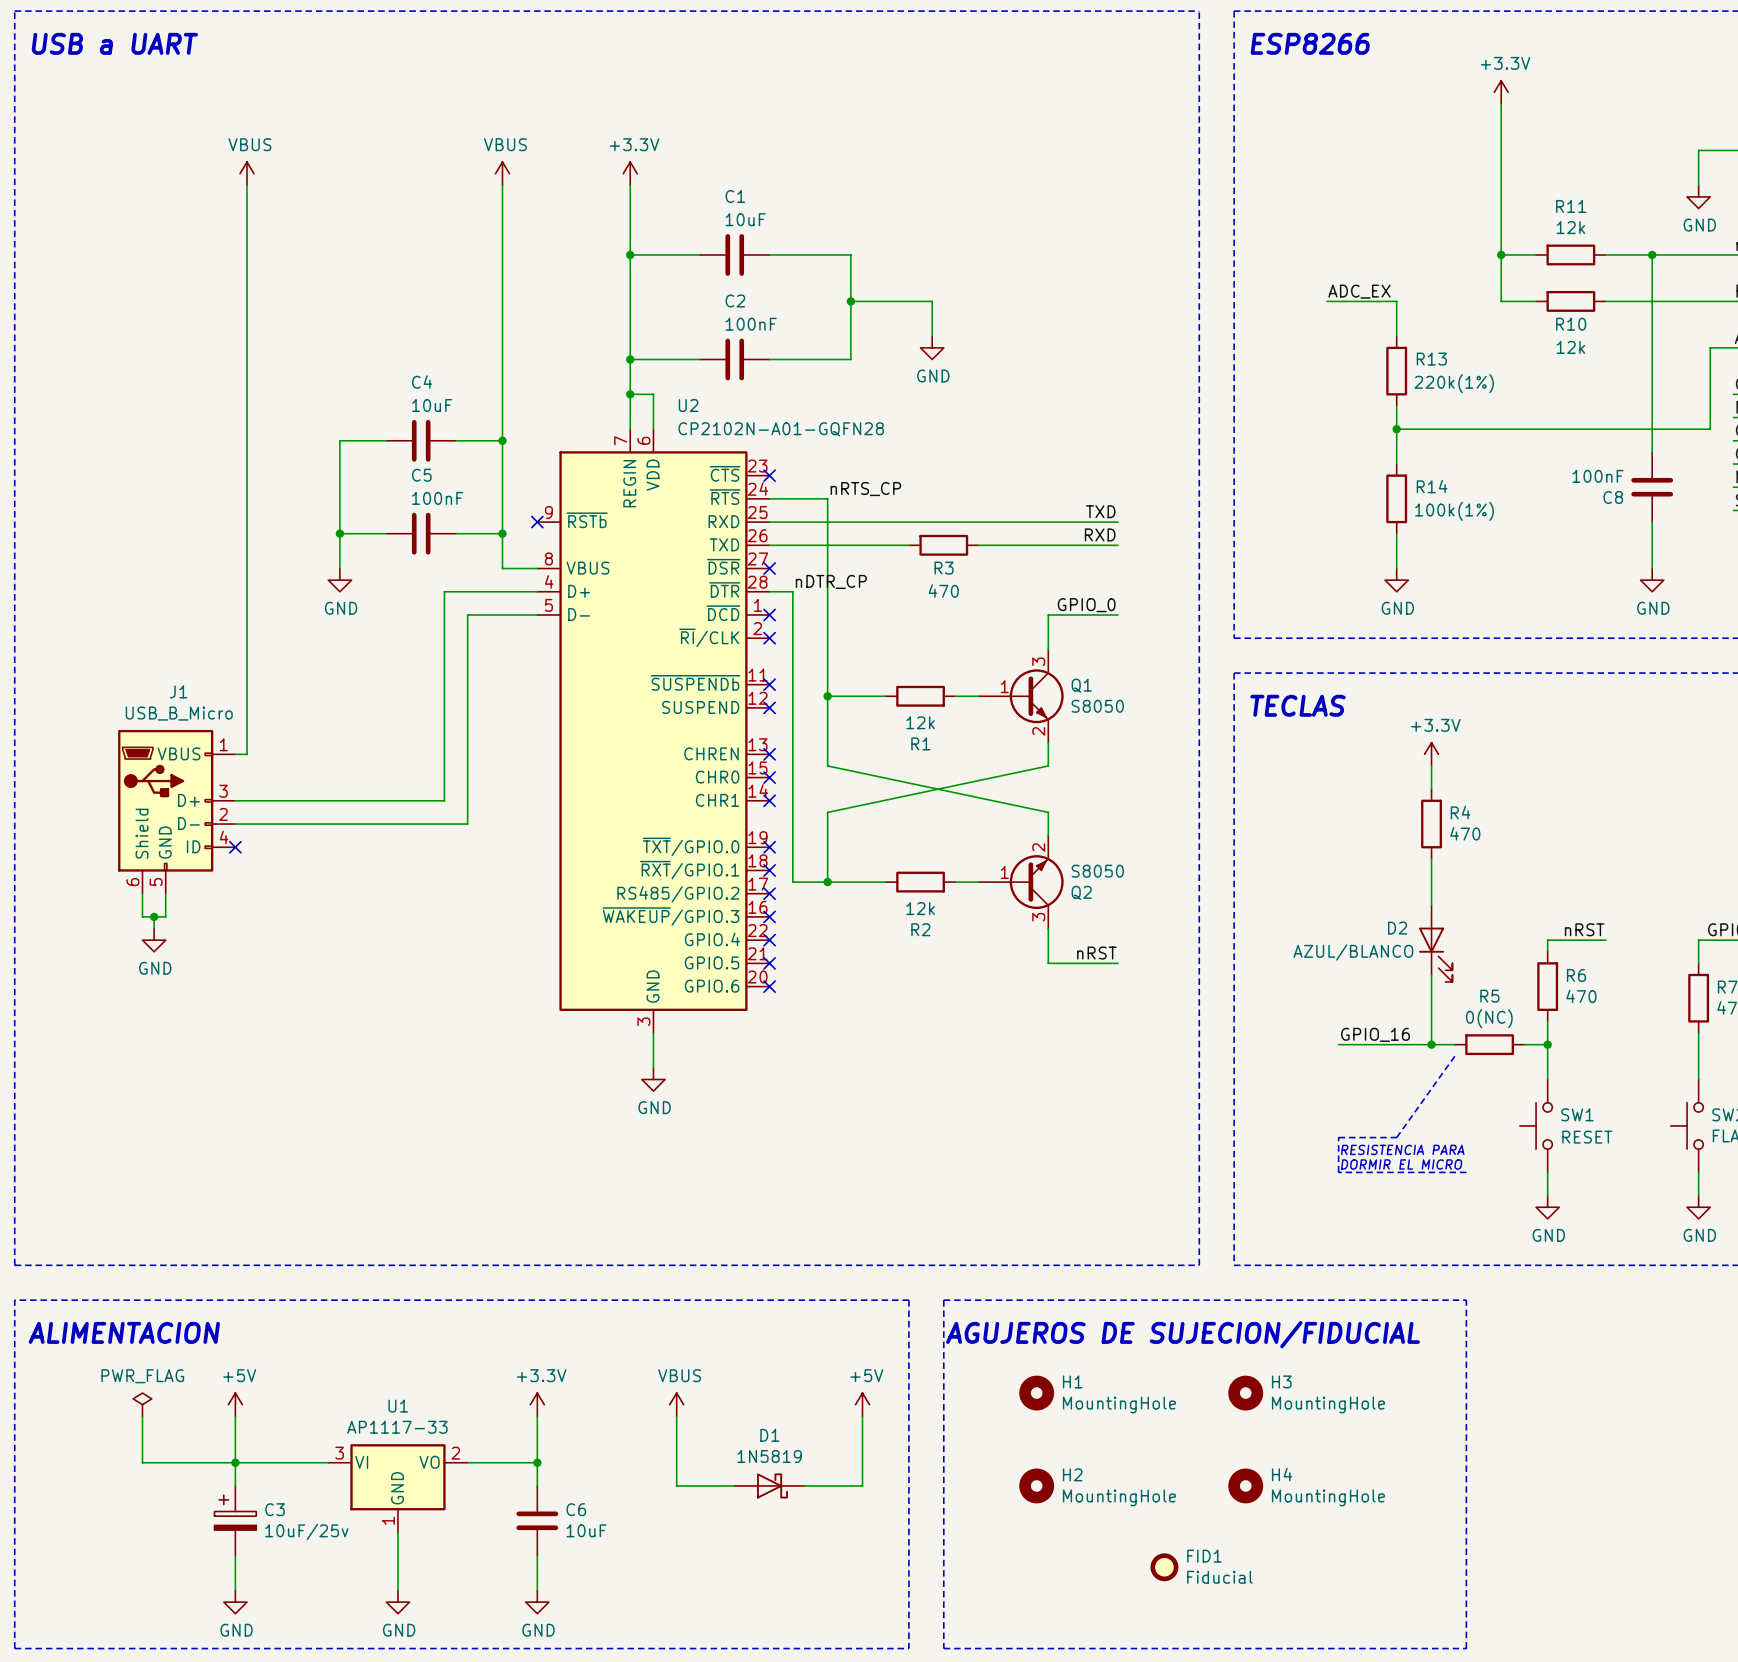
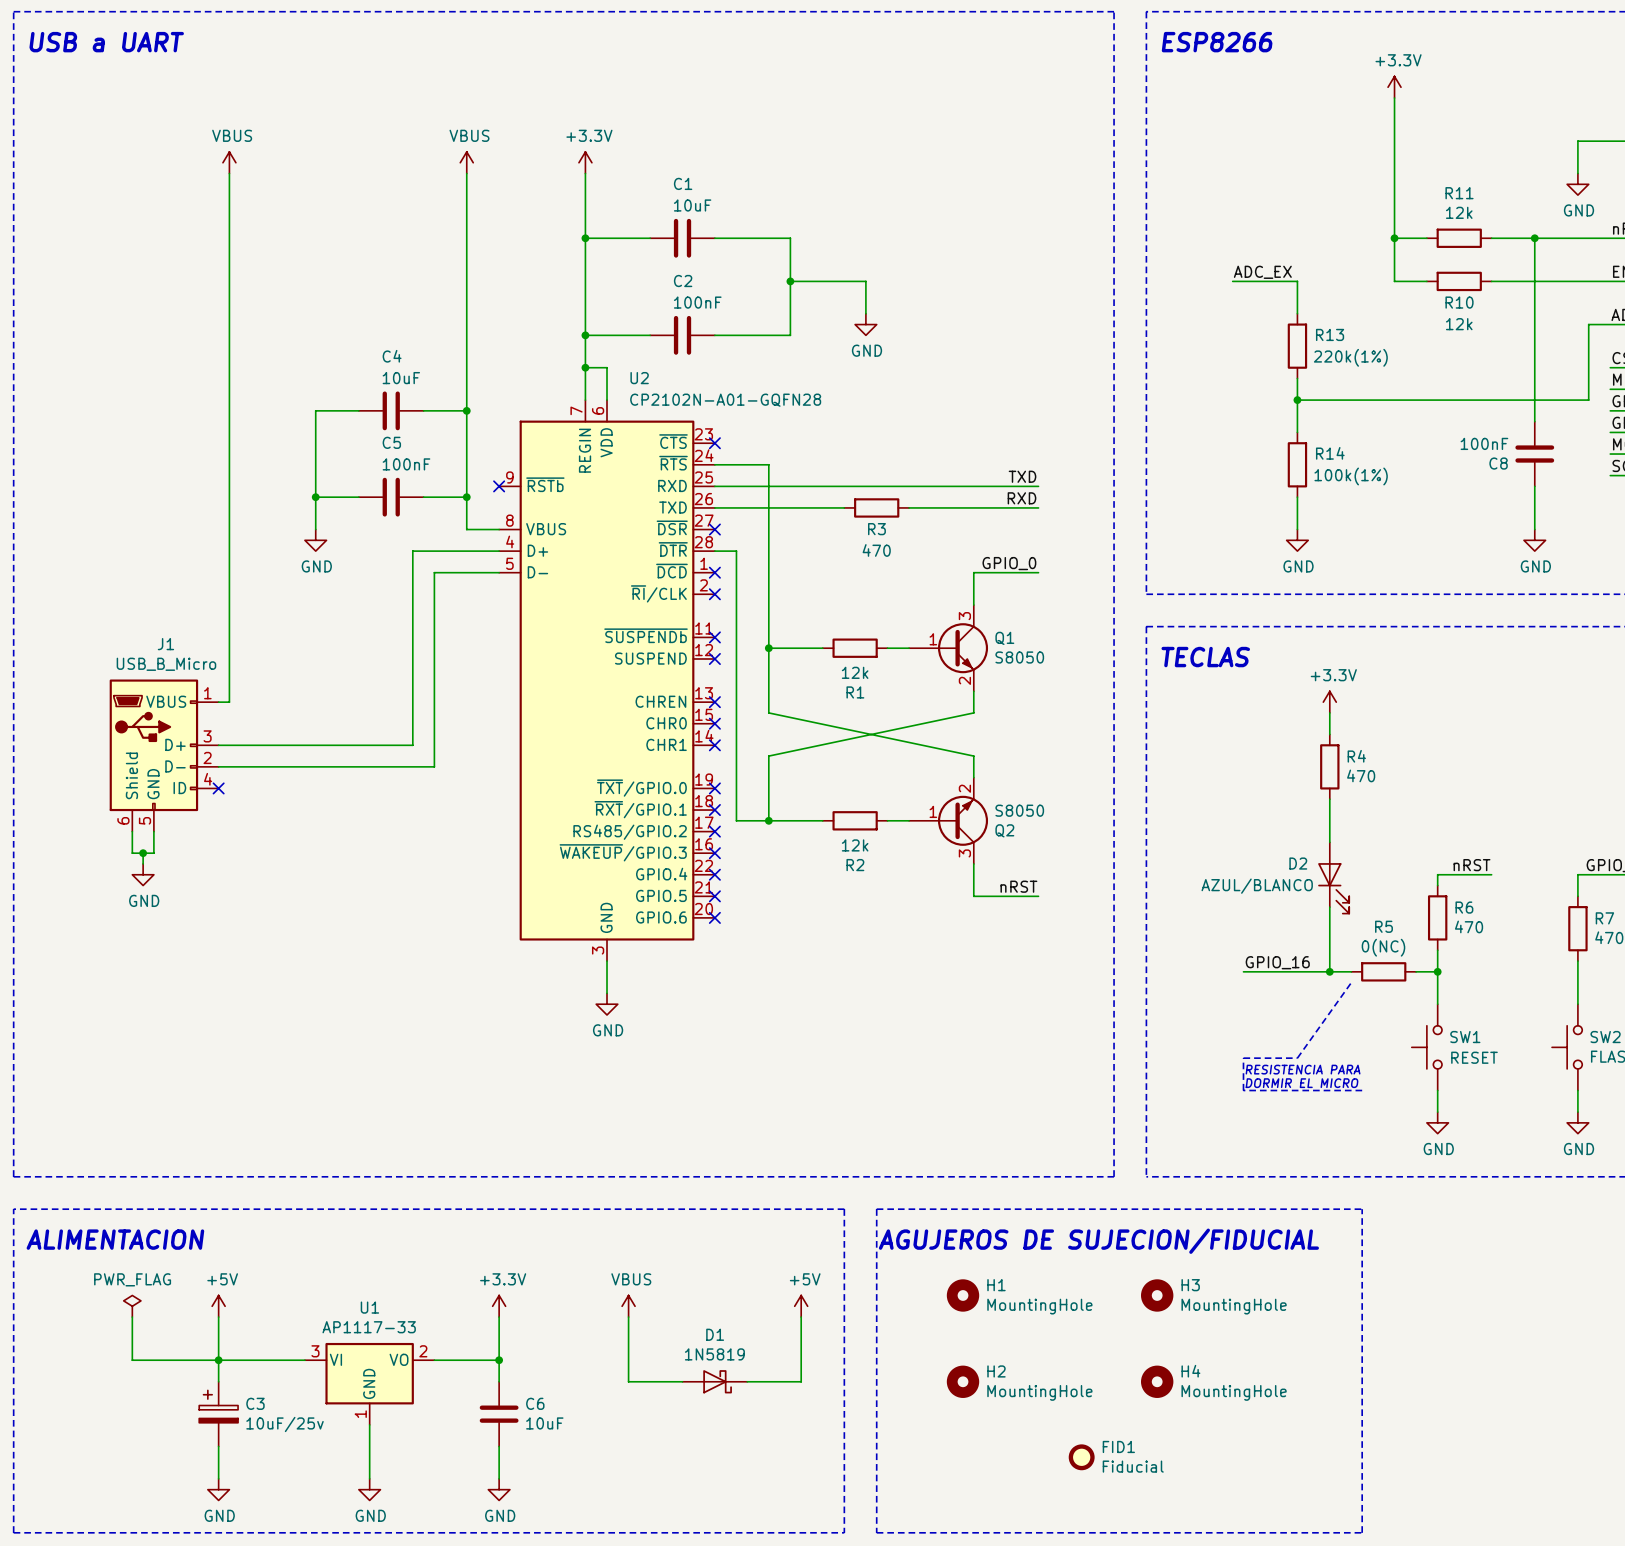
label: nRTS_CP (865, 489) -> none
label: nDTR_CP (831, 581) -> none

